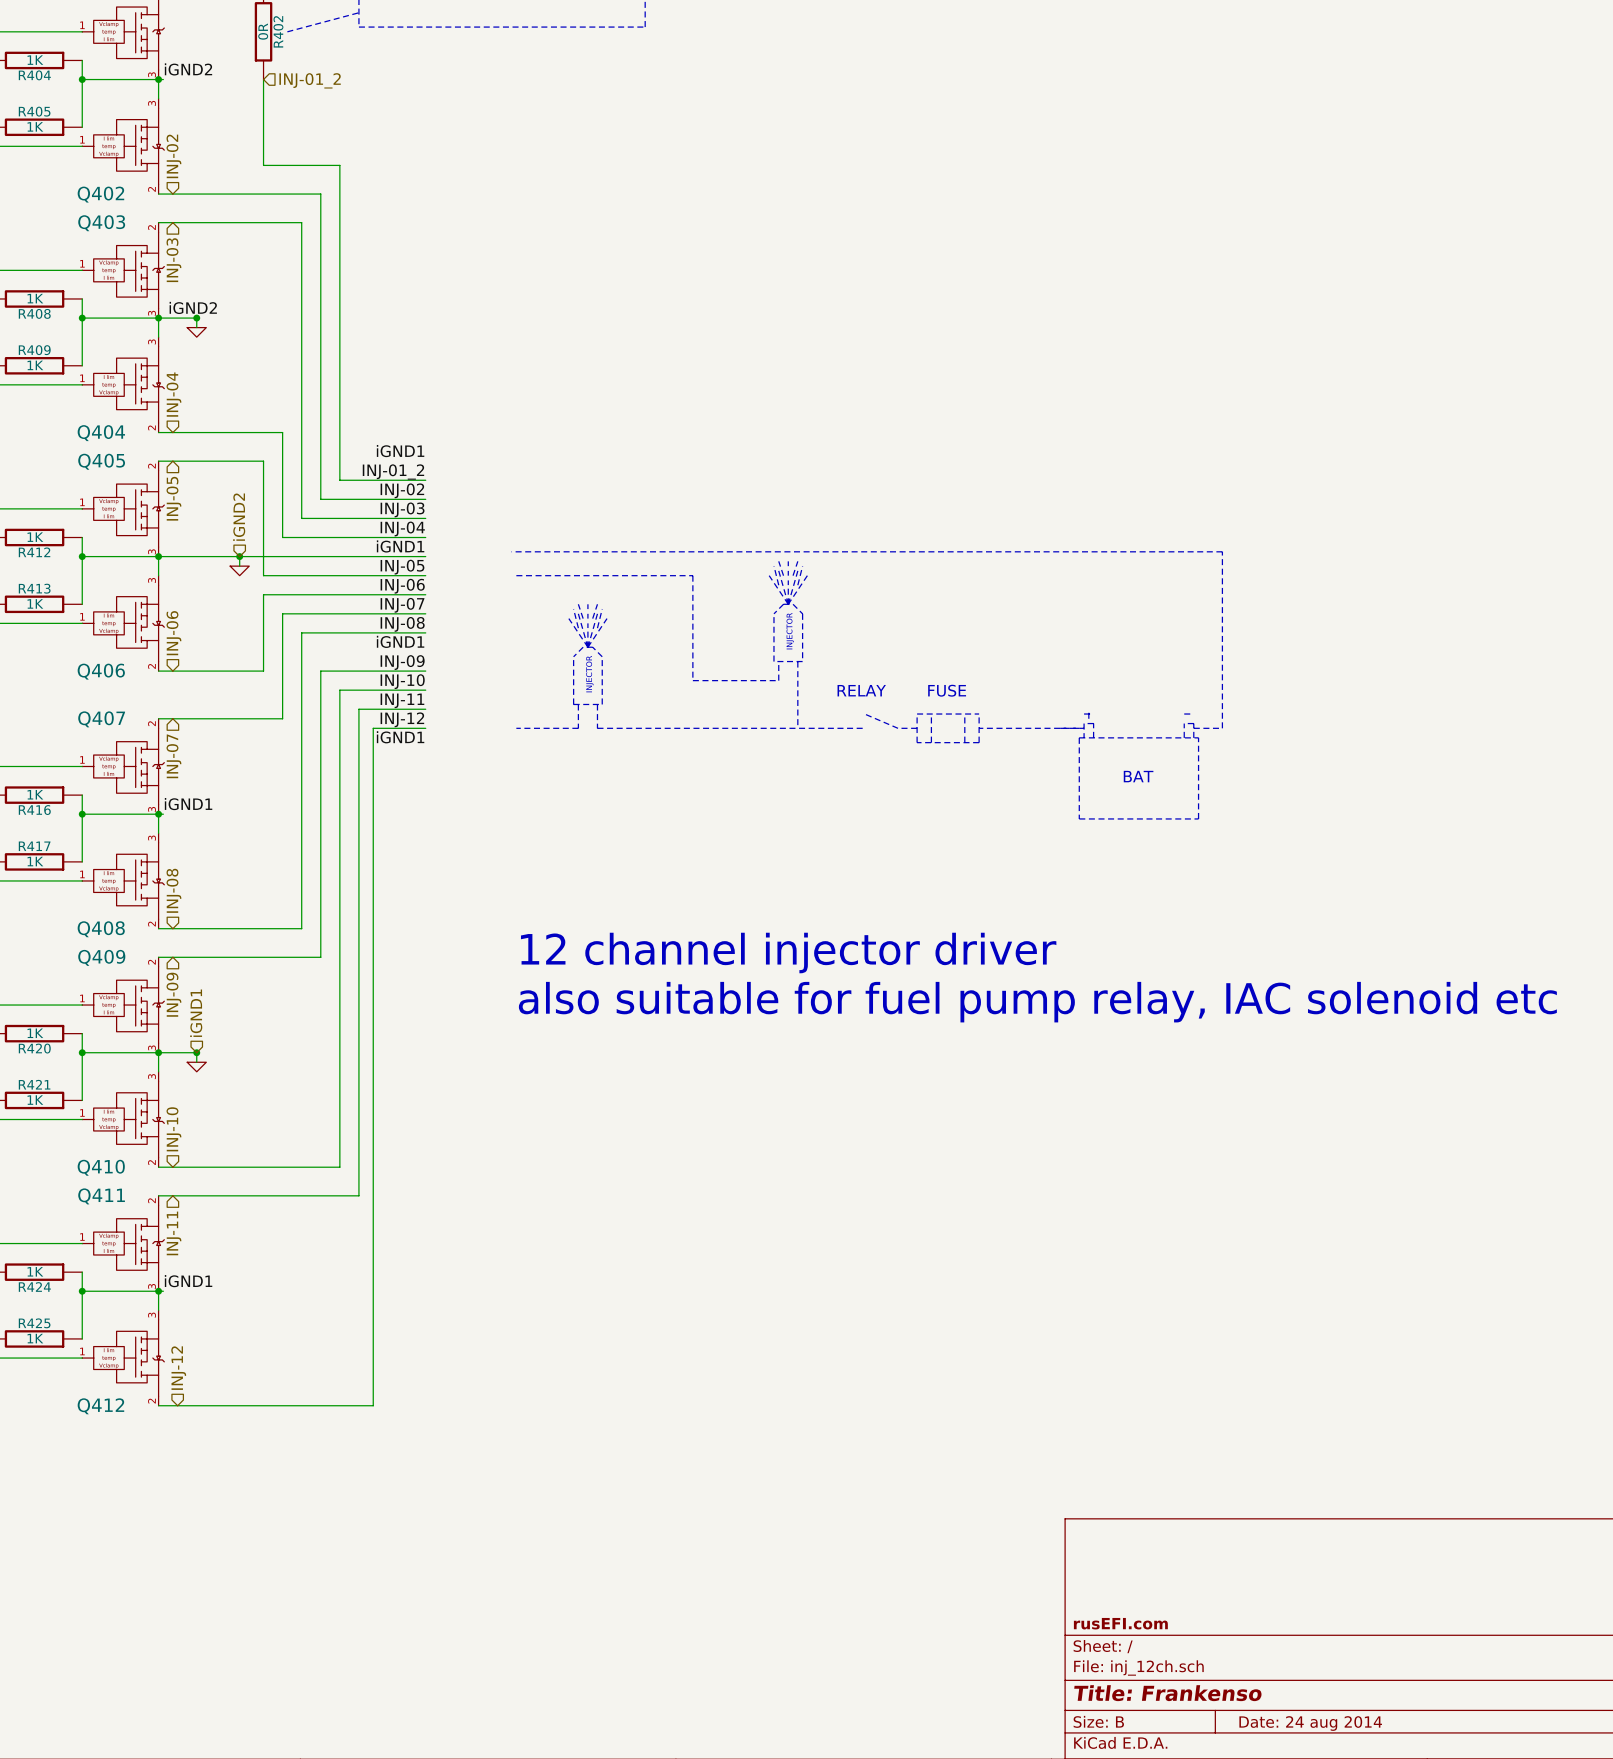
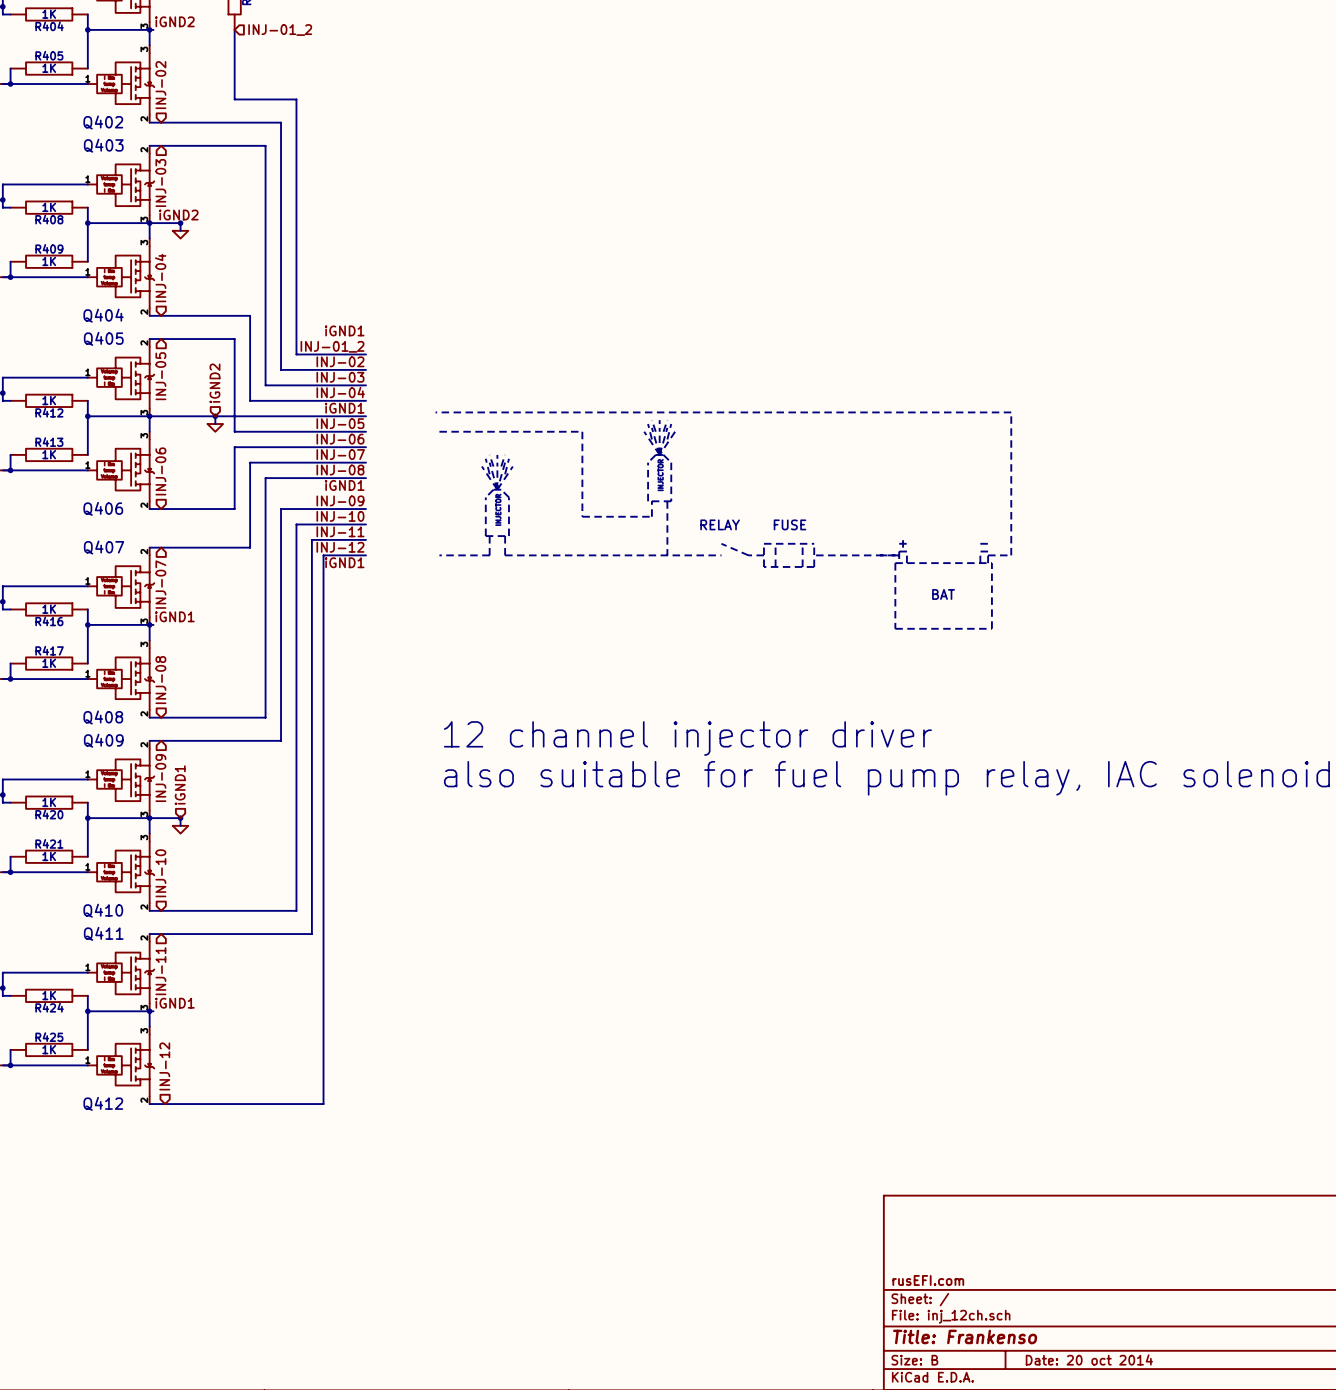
title block: Date: 24 aug 2014 (1310, 1723) -> Date: 20 oct 2014 (1089, 1359)

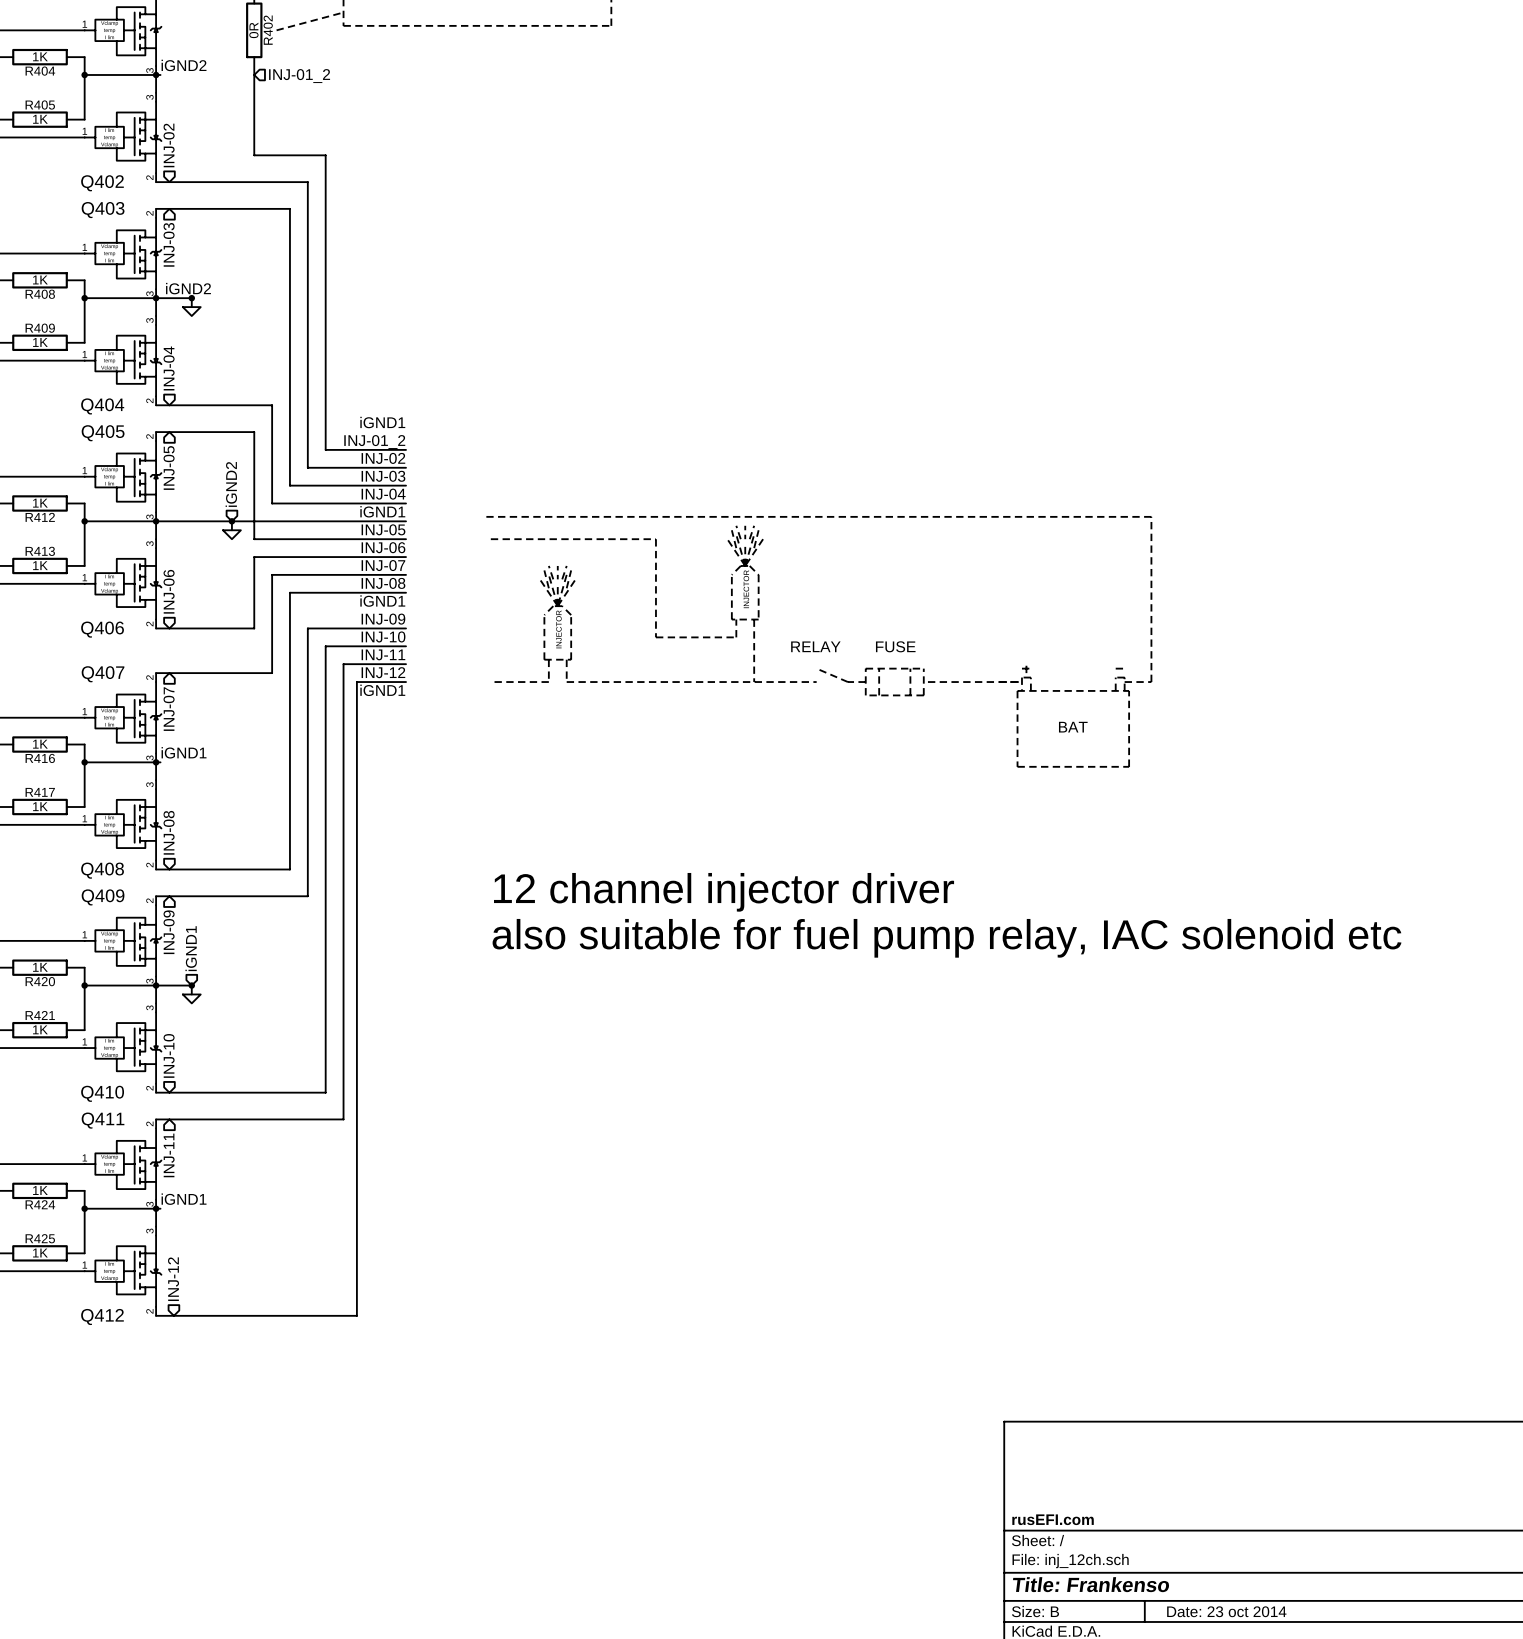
title block: Date: 20 oct 2014 (1089, 1359) -> Date: 23 oct 2014 (1226, 1611)

